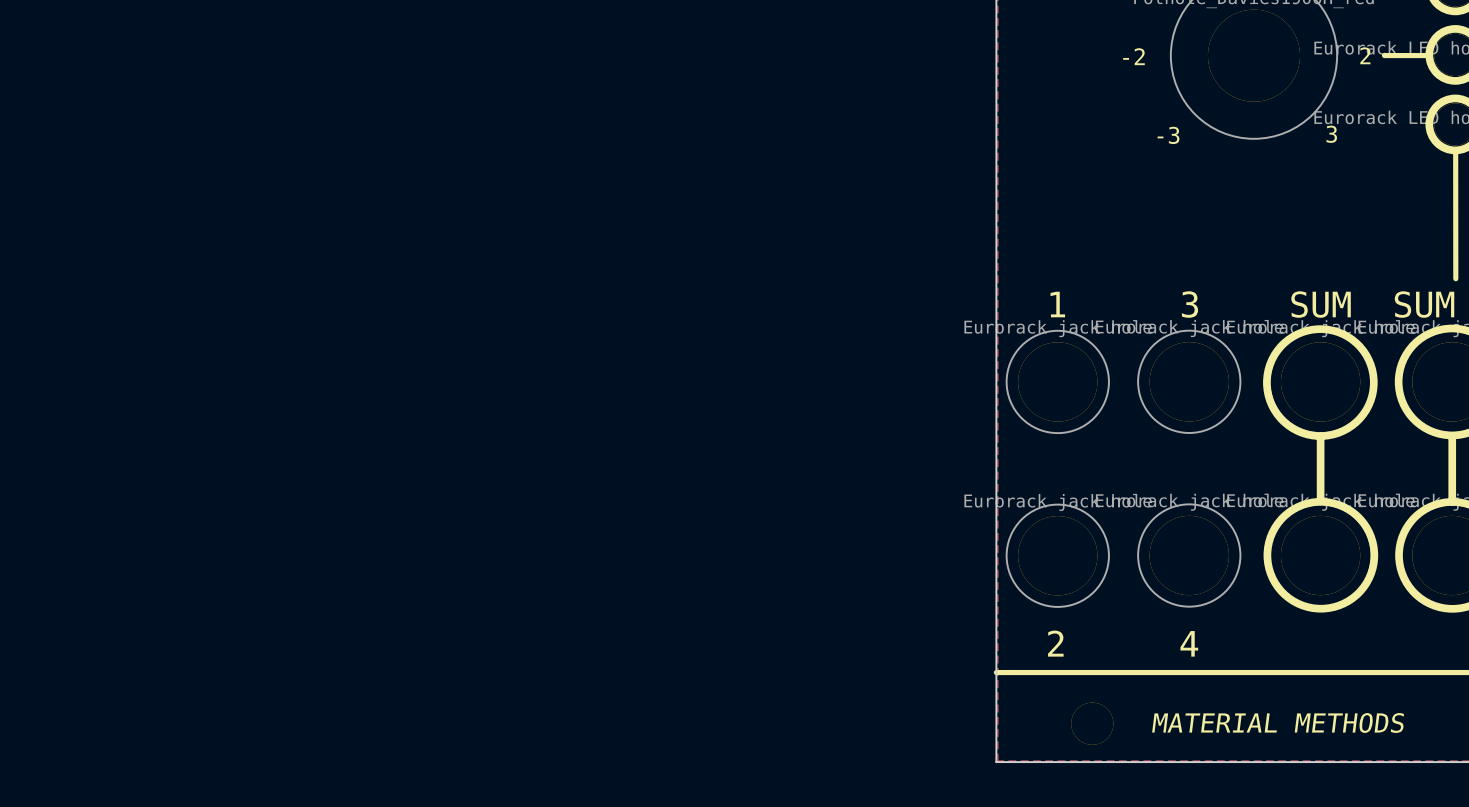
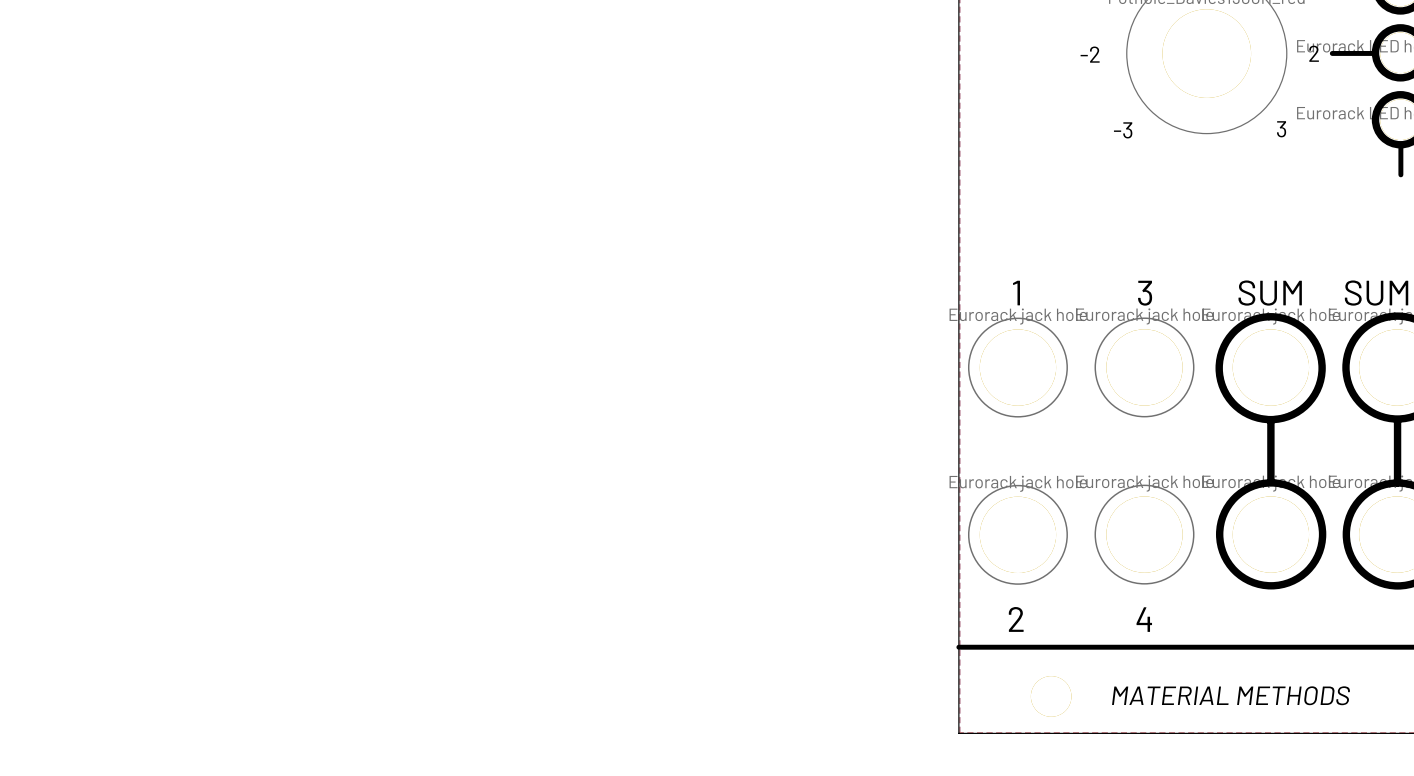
line: (1455, 150) (1455, 278) -> (1400, 144) (1400, 174)

